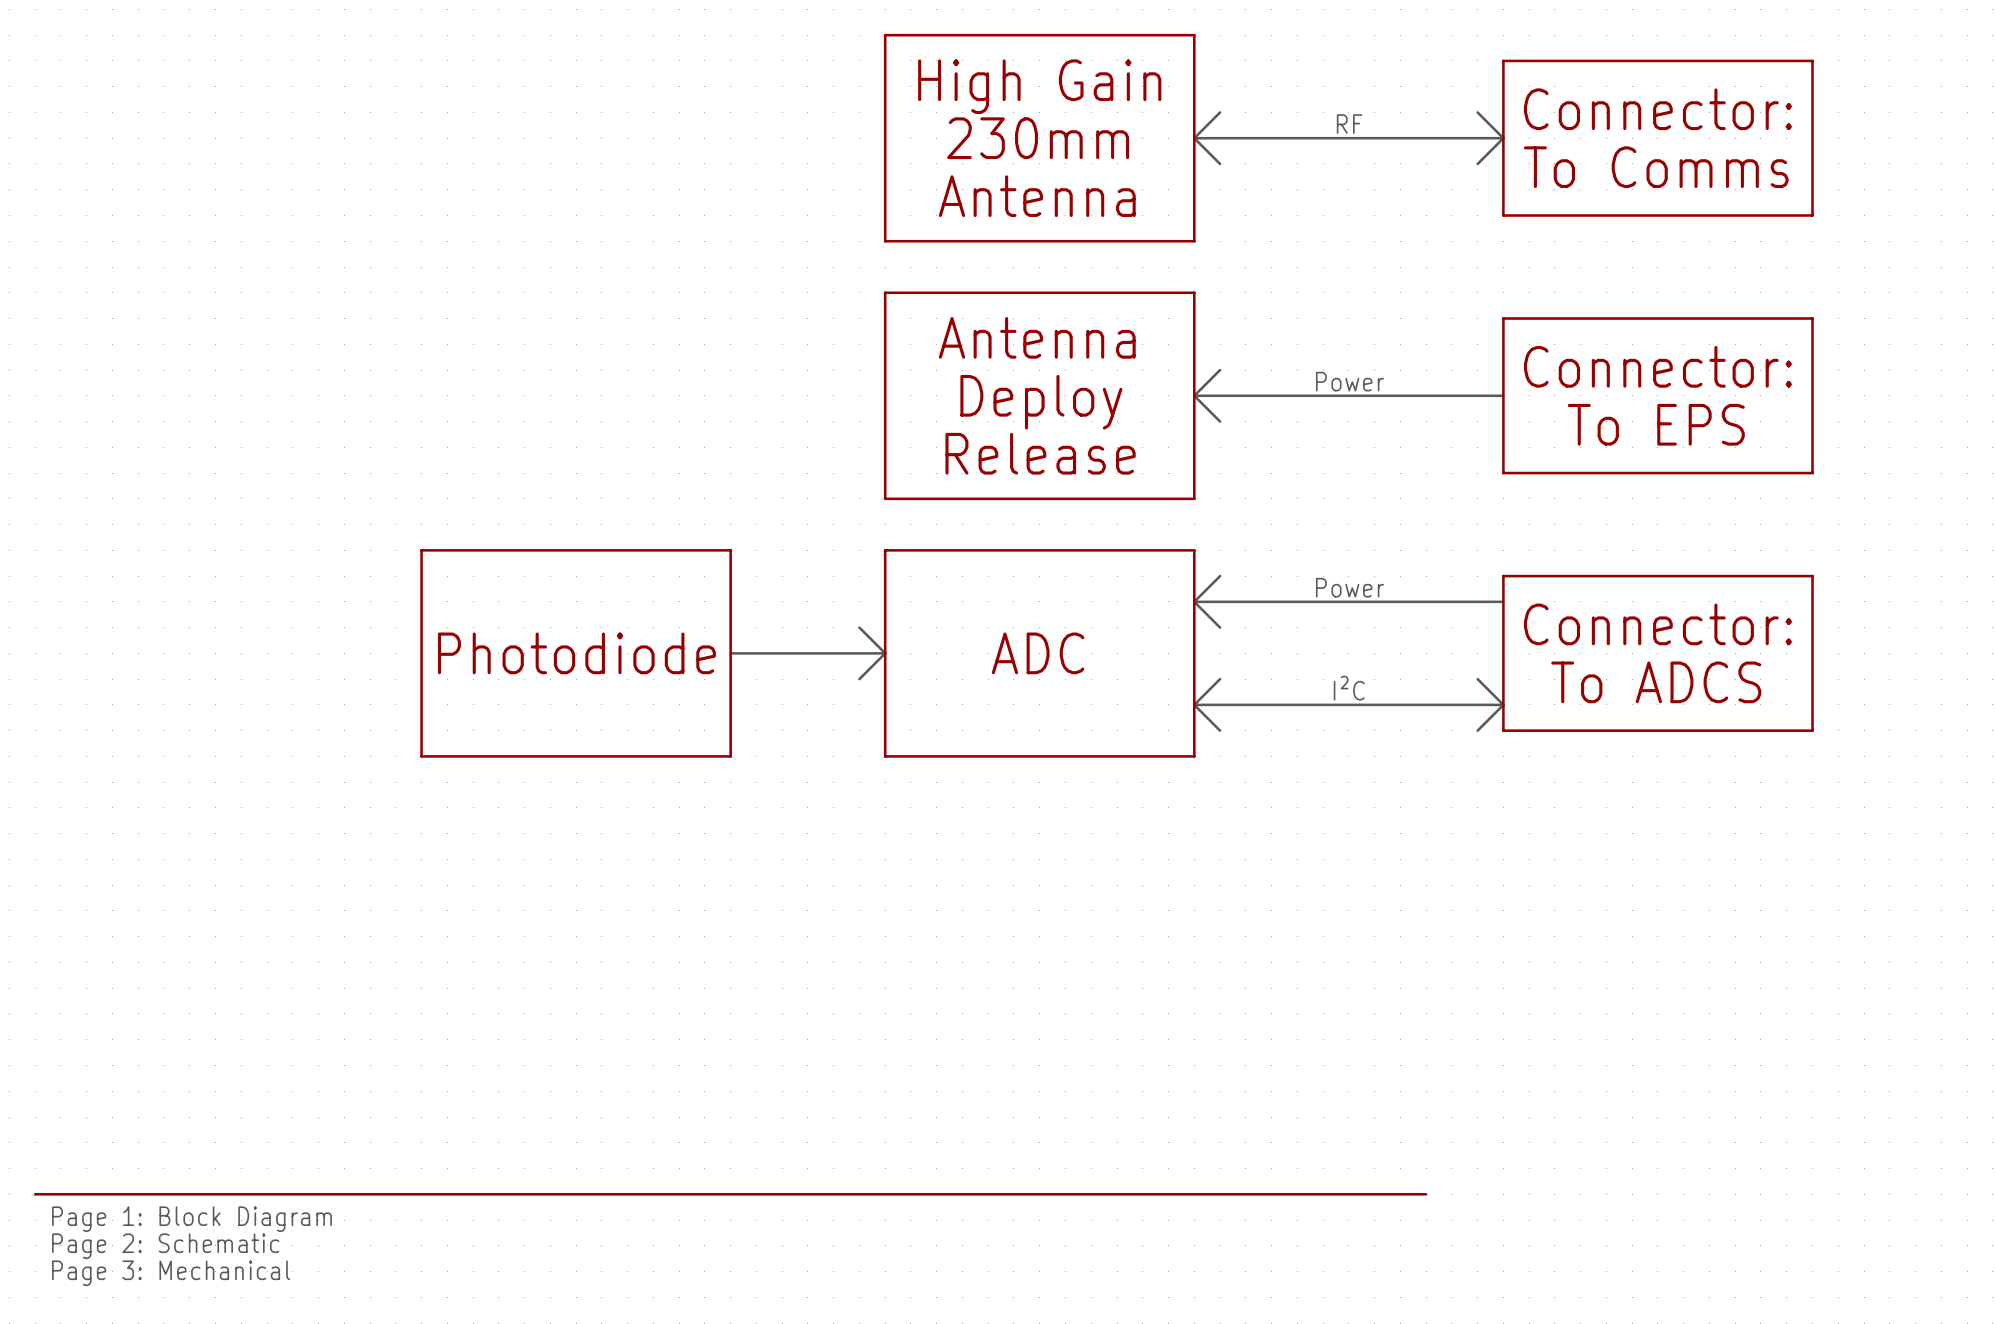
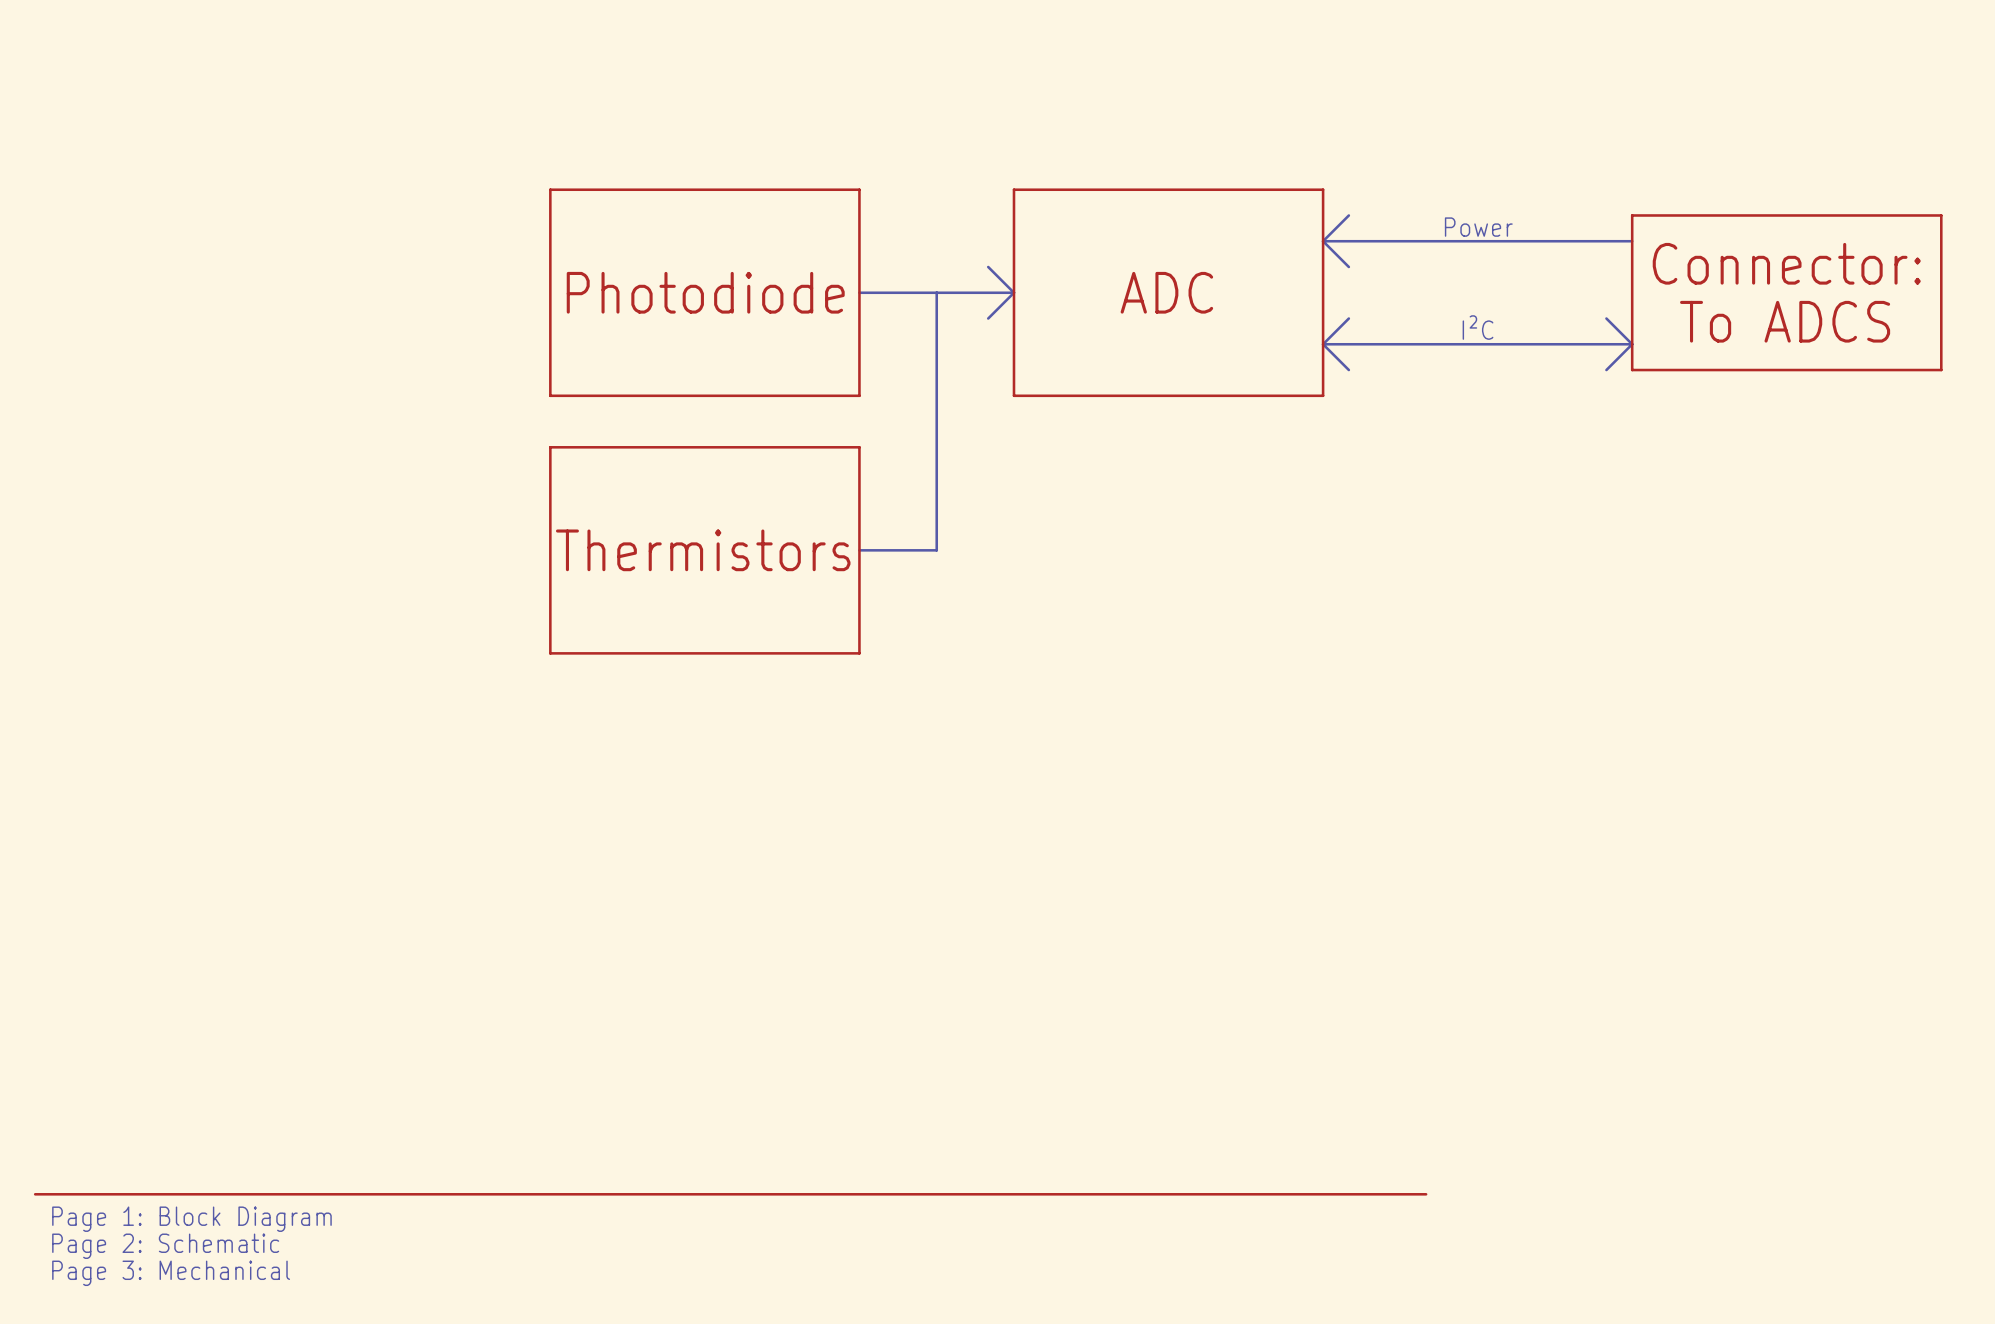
line: (885, 35) (1194, 35) (1194, 241) (885, 241) (885, 35) -> none
text: High Gain (1039, 86) -> none
text: Connector: (1657, 109) -> none
line: (1220, 112) (1194, 138) -> (1348, 318) (1323, 344)
line: (1477, 112) (1503, 138) -> (1606, 318) (1632, 344)
text: RF (1349, 124) -> none
text: 230mm (1038, 138) -> none
line: (1194, 138) (1503, 138) -> (1323, 344) (1632, 344)
line: (1194, 138) (1220, 163) -> (1323, 344) (1348, 370)
line: (1503, 138) (1477, 163) -> (1632, 344) (1606, 370)
text: To Comms (1656, 167) -> none
line: none -> (550, 189) (859, 189) (859, 395) (550, 395) (550, 189)
text: Antenna (1037, 196) -> none
line: (1632, 215) (1503, 215) (1503, 60) (1812, 60) (1812, 215) -> (1632, 215) (1632, 370) (1941, 370) (1941, 215) (1812, 215)
text: none -> Power (1478, 227)
text: none -> Connector: (1786, 263)
line: none -> (988, 267) (1013, 292)
text: none -> Photodiode (705, 292)
line: none -> (859, 292) (1013, 292)
line: (885, 292) (885, 498) (1194, 498) (1194, 292) (885, 292) -> (1013, 189) (1013, 395) (1323, 395) (1323, 189) (1013, 189)
line: none -> (936, 292) (936, 550) (859, 550)
line: none -> (1013, 292) (988, 318)
text: none -> ADC (1166, 292)
line: (1503, 318) (1503, 473) (1812, 473) (1812, 318) (1503, 318) -> none
text: none -> To ADCS (1785, 321)
text: none -> I²C (1478, 327)
text: Antenna (1037, 337) -> none
text: Connector: (1657, 366) -> none
line: (1220, 370) (1194, 395) -> (1348, 215) (1323, 241)
text: Power (1350, 381) -> none
line: (1194, 395) (1503, 395) -> (1323, 241) (1632, 241)
line: (1194, 395) (1220, 421) -> (1323, 241) (1348, 267)
text: Deploy (1041, 402) -> none
text: To EPS (1656, 424) -> none
text: Release (1040, 453) -> none
line: (421, 550) (730, 550) (730, 756) (421, 756) (421, 550) -> (550, 447) (859, 447) (859, 653) (550, 653) (550, 447)
text: none -> Thermistors (703, 550)
line: (885, 550) (885, 756) (1194, 756) (1194, 550) (885, 550) -> none
line: (1220, 576) (1194, 601) -> none
line: (1503, 576) (1503, 730) (1812, 730) (1812, 576) (1503, 576) -> none
text: Power (1350, 587) -> none
line: (1194, 601) (1503, 601) -> none
line: (1194, 601) (1220, 627) -> none
text: Connector: (1657, 624) -> none
line: (859, 627) (885, 653) -> none
text: Photodiode (576, 653) -> none
line: (730, 653) (885, 653) -> none
line: (885, 653) (859, 679) -> none
text: ADC (1038, 653) -> none
line: (1220, 679) (1194, 704) -> none
line: (1477, 679) (1503, 704) -> none
text: To ADCS (1656, 682) -> none
text: I²C (1349, 688) -> none
line: (1194, 704) (1503, 704) -> none
line: (1194, 704) (1220, 730) -> none
line: (1503, 704) (1477, 730) -> none

